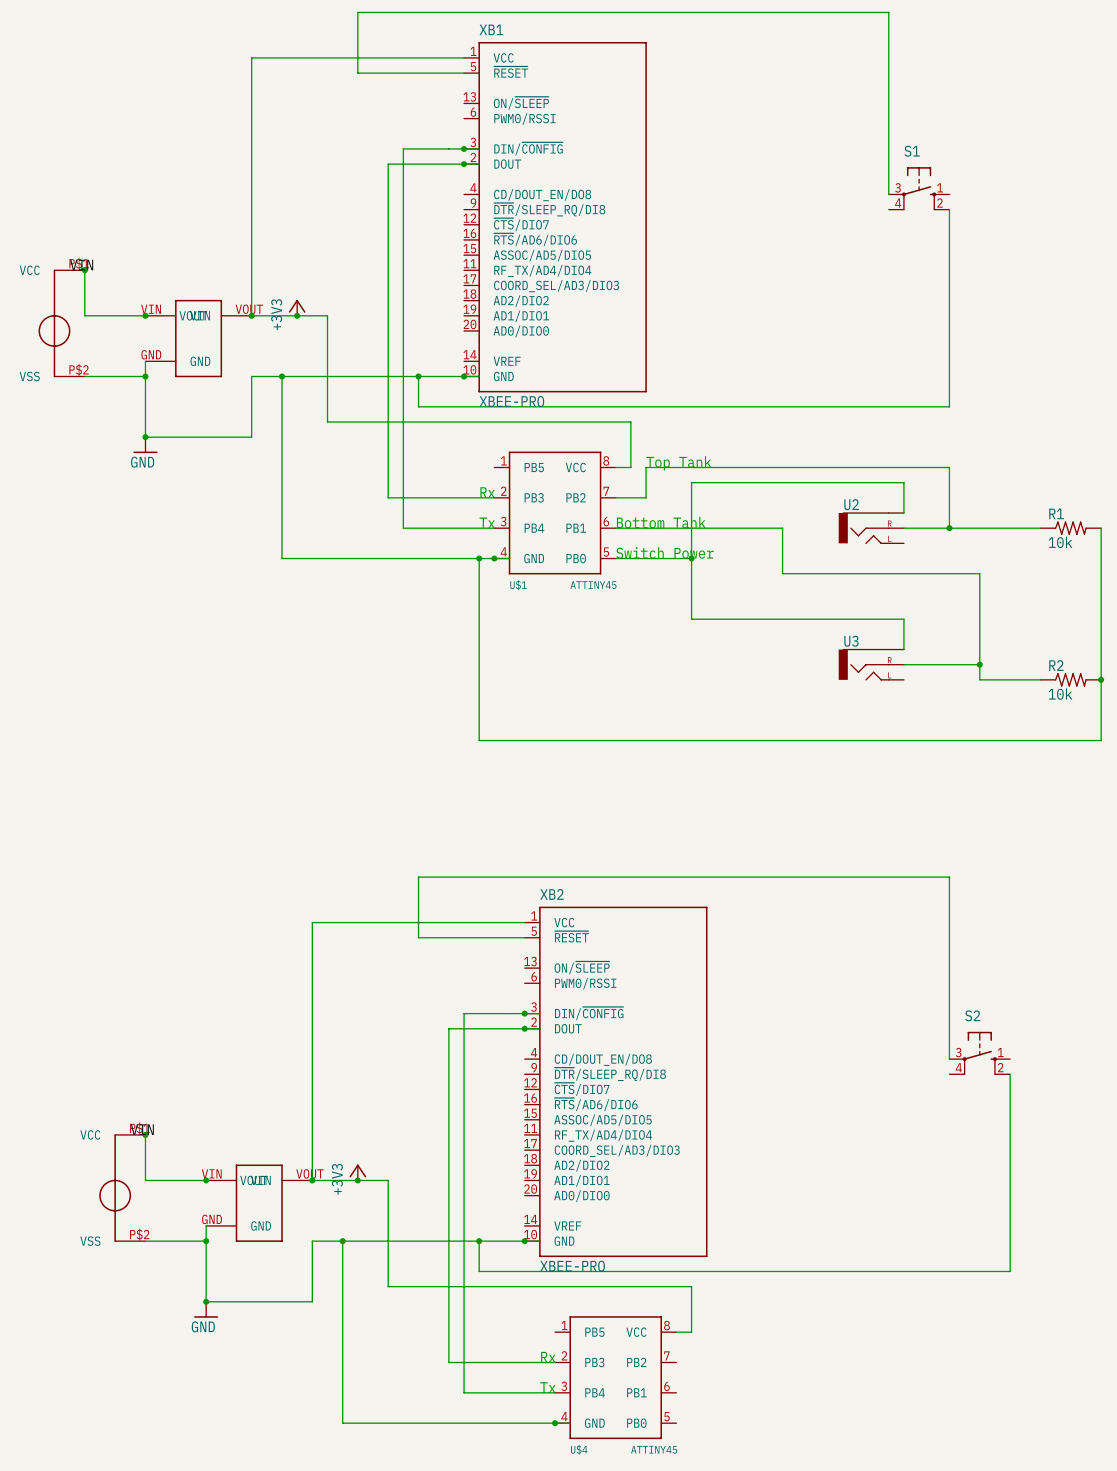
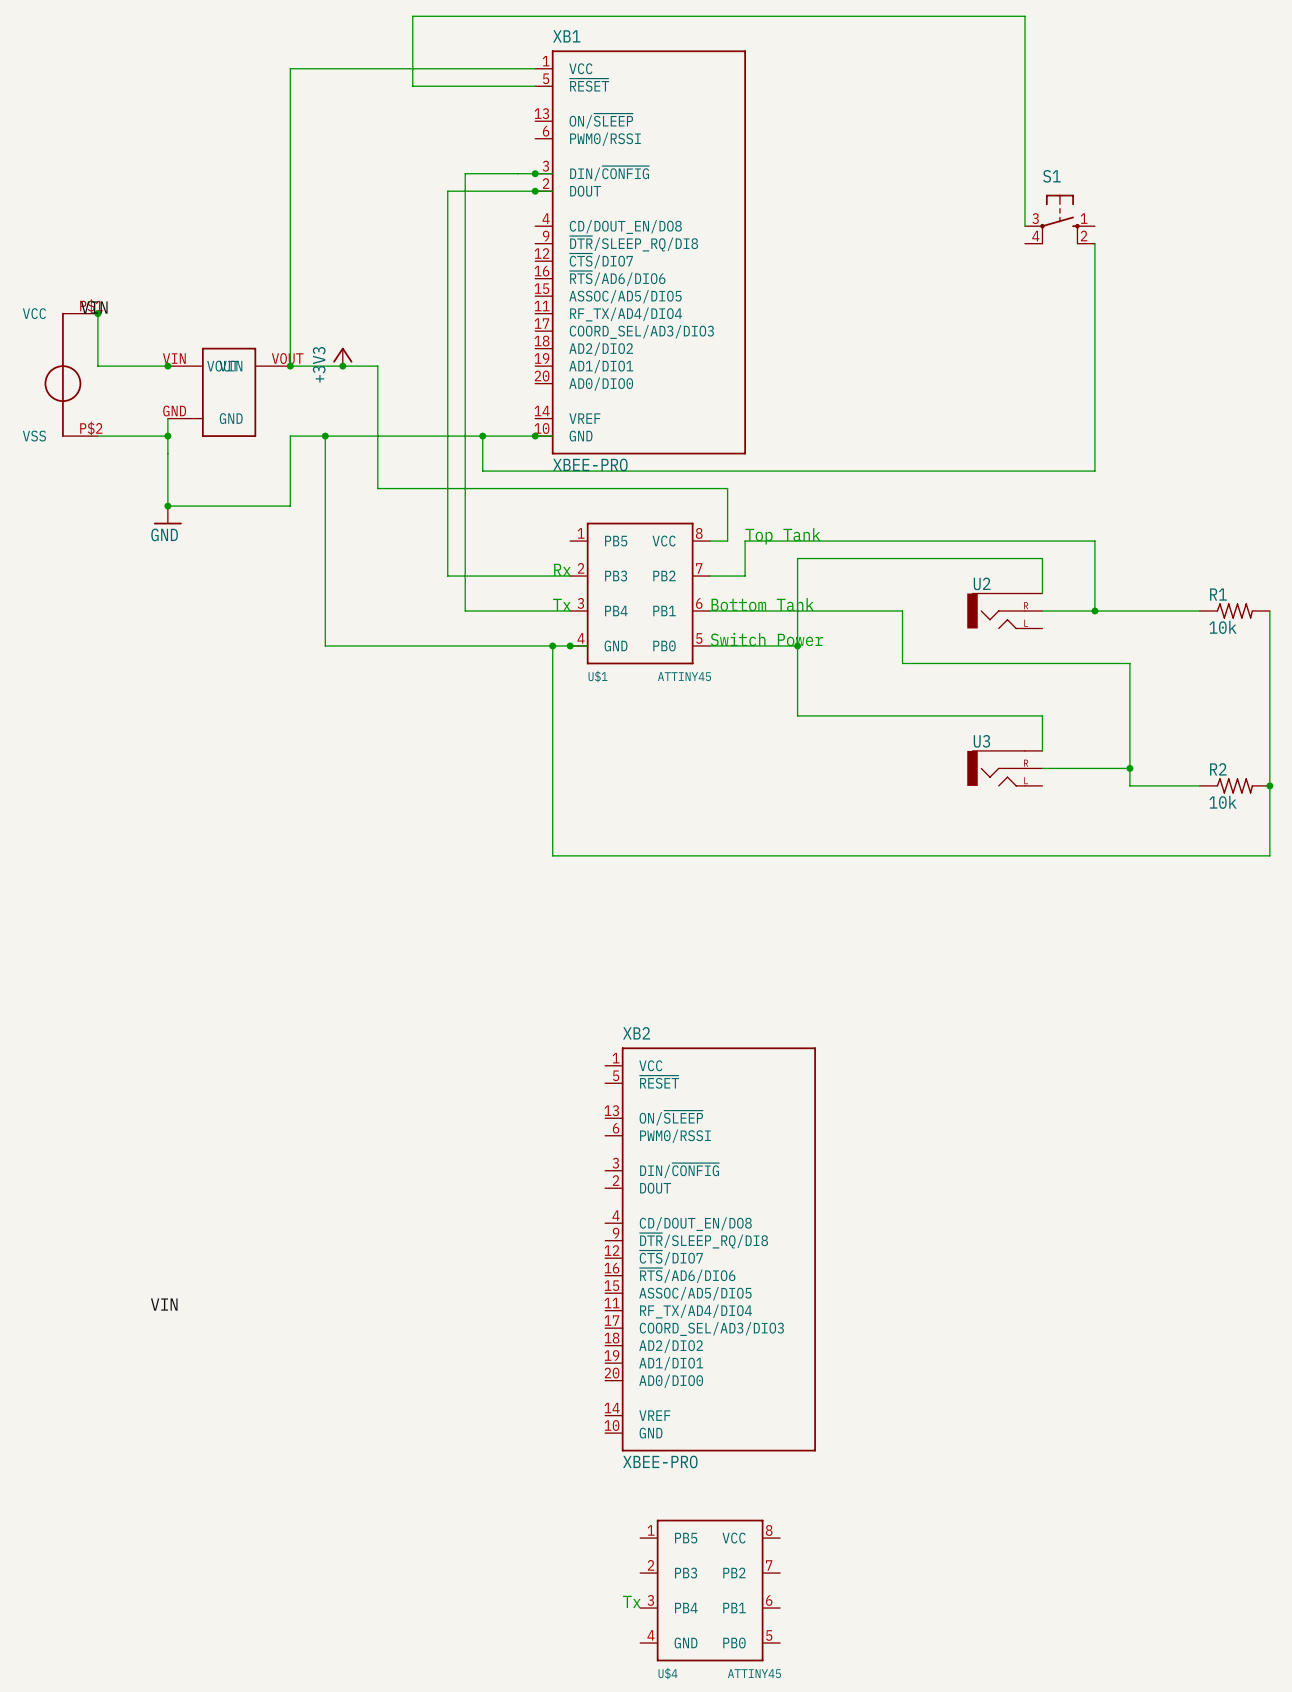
wire: (524, 922) (312, 922) (312, 1180) (388, 1180) (388, 1286) (691, 1286) (691, 1332) (676, 1332) -> none
wire: (524, 937) (418, 937) (418, 877) (949, 877) (949, 1059) -> none
junction: (524, 1013) -> none
wire: (539, 1013) (464, 1013) (464, 1392) (555, 1392) -> none
junction: (524, 1028) -> none
wire: (539, 1028) (448, 1028) (448, 1362) (555, 1362) -> none
S2: (979, 1053) -> none
wire: (1010, 1074) (1010, 1271) (479, 1271) (479, 1241) -> none
wire: (145, 1134) (145, 1180) (206, 1180) -> none
junction: (145, 1134) -> none
power symbol: +3V3 (357, 1172) -> none
junction: (206, 1180) -> none
junction: (312, 1180) -> none
junction: (357, 1180) -> none
part: (122, 1188) -> none
part: (259, 1203) -> none
wire: (206, 1225) (206, 1301) (312, 1301) (312, 1241) (539, 1241) -> none
wire: (145, 1241) (206, 1241) -> none
junction: (206, 1241) -> none
wire: (342, 1241) (342, 1423) (570, 1423) -> none
junction: (342, 1241) -> none
junction: (479, 1241) -> none
junction: (524, 1241) -> none
junction: (206, 1301) -> none
power symbol: GND (206, 1309) -> none
text: Rx (548, 1357) -> none
junction: (555, 1423) -> none

